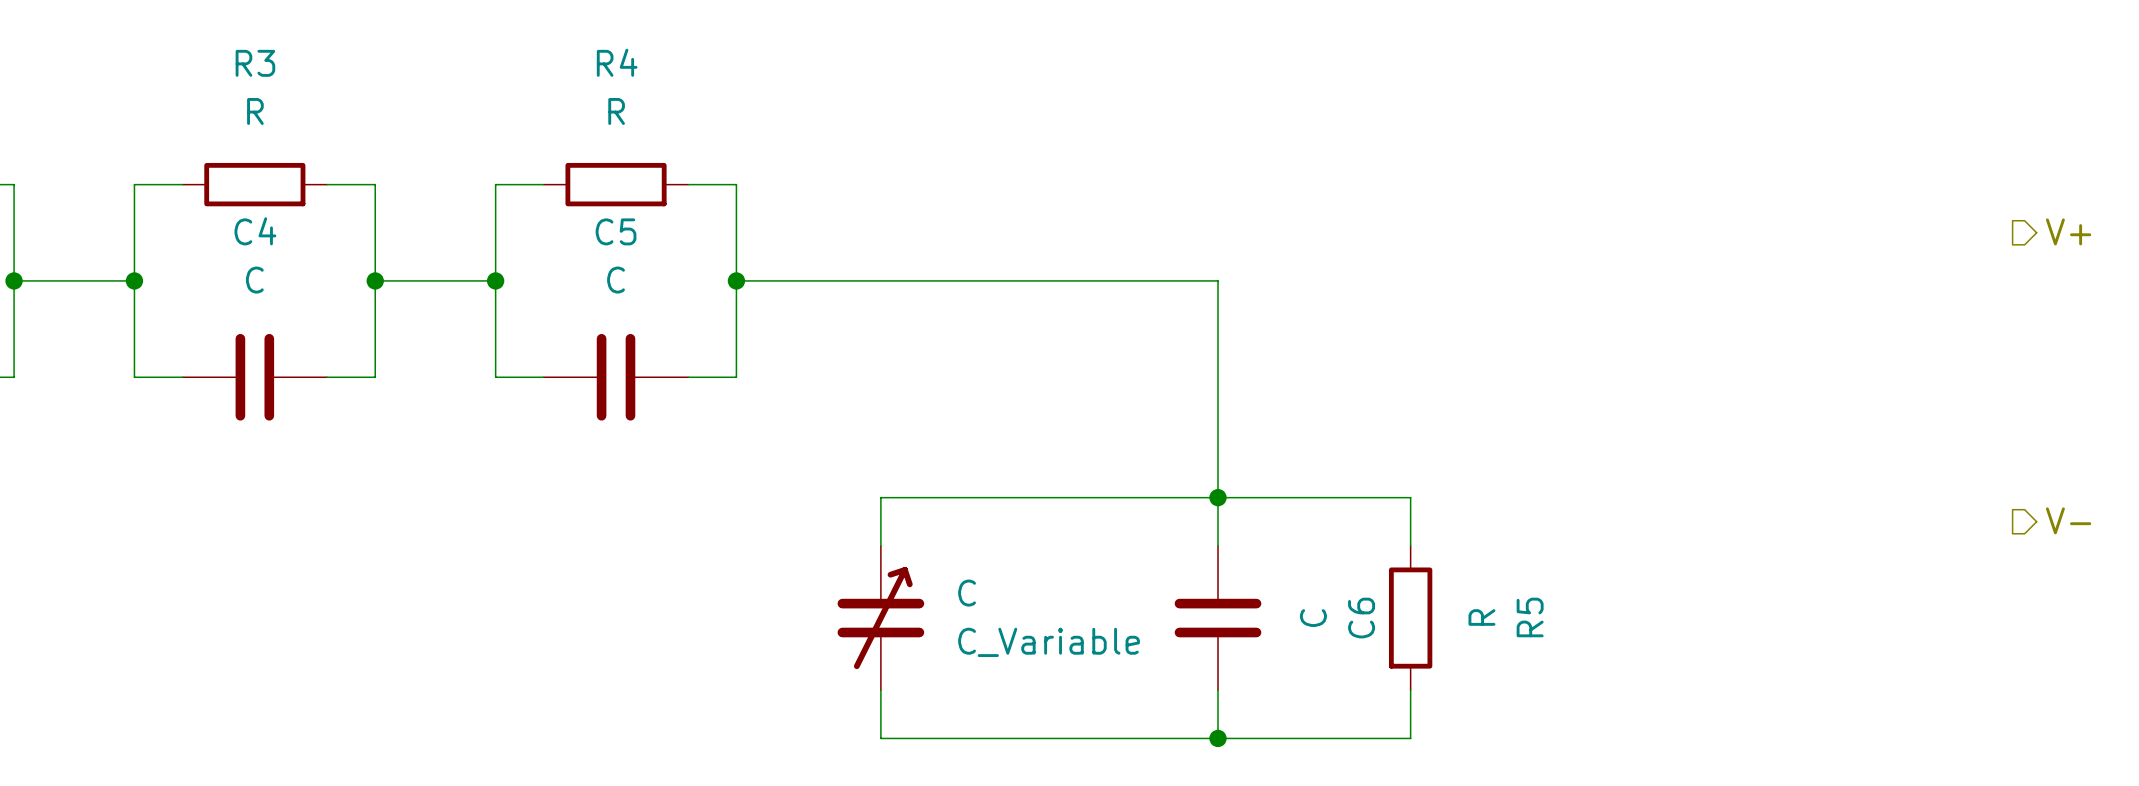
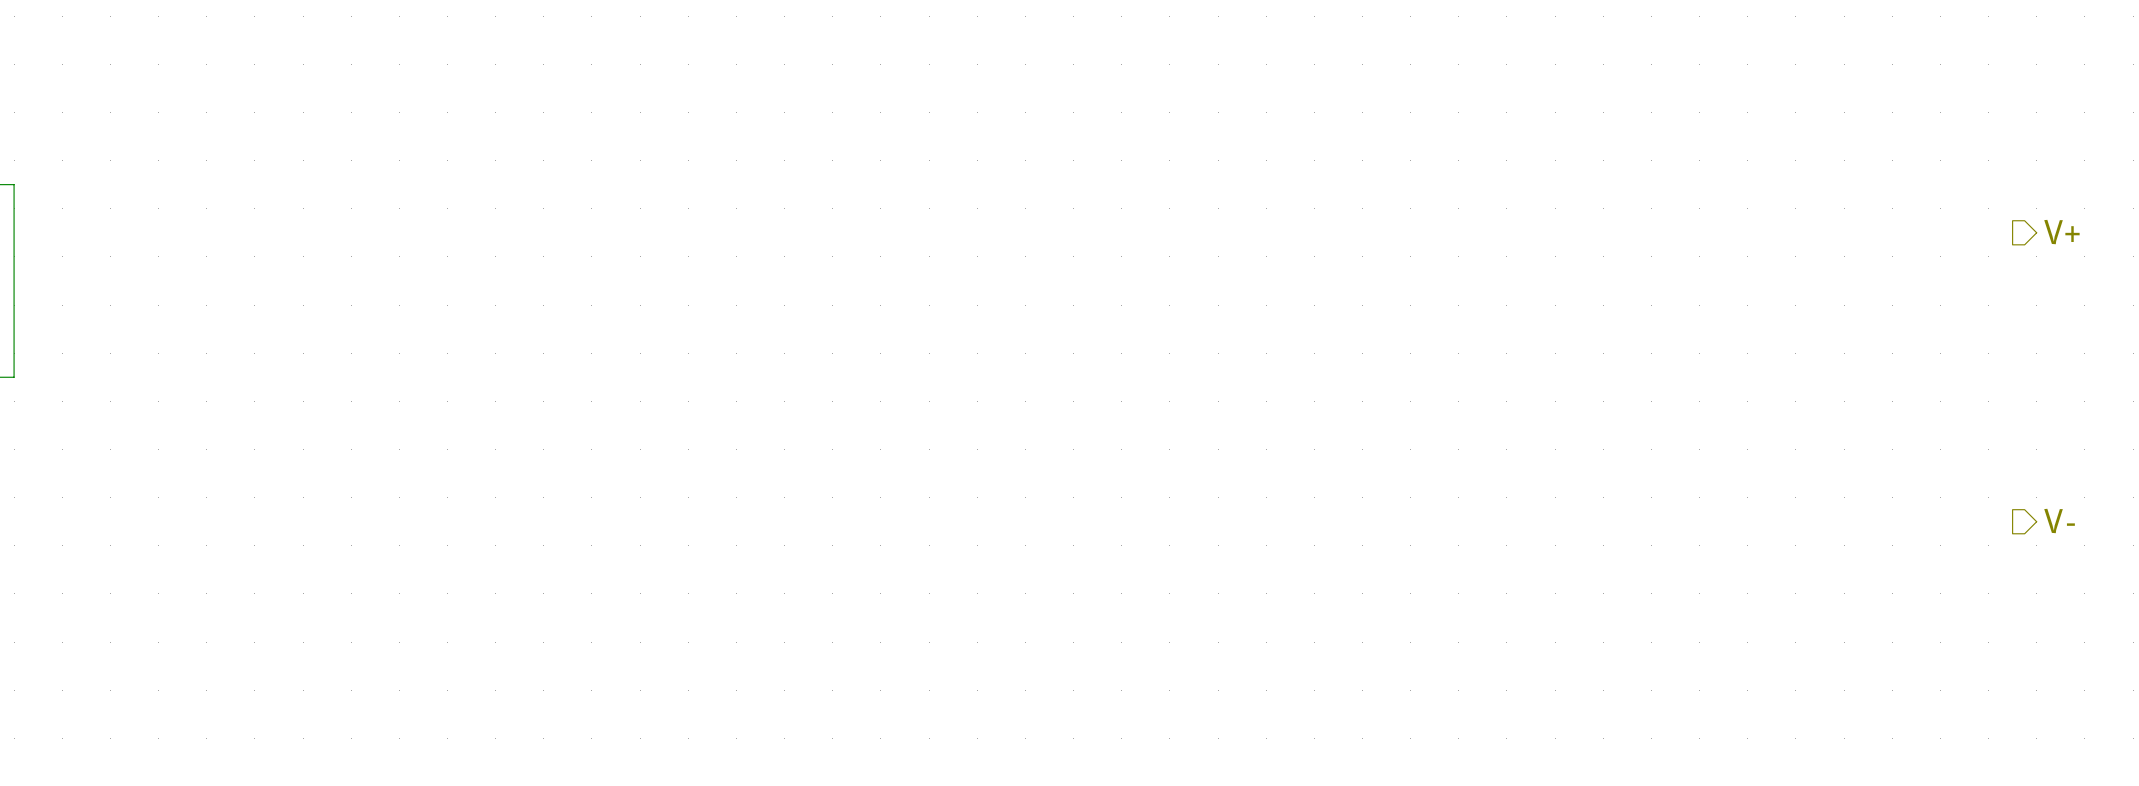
wire: (182, 184) (134, 184) (134, 377) (182, 377) -> none
R3: R (254, 184) -> none
wire: (327, 184) (375, 184) (375, 377) (327, 377) -> none
wire: (543, 184) (495, 184) (495, 377) (543, 377) -> none
R4: R (616, 184) -> none
wire: (688, 184) (736, 184) (736, 377) (688, 377) -> none
wire: (14, 280) (134, 280) -> none
junction: (14, 280) -> none
junction: (134, 280) -> none
wire: (375, 280) (495, 280) -> none
junction: (375, 280) -> none
junction: (495, 280) -> none
wire: (736, 280) (1218, 280) (1218, 545) -> none
junction: (736, 280) -> none
C4: C (254, 377) -> none
C5: C (616, 377) -> none
junction: (1218, 497) -> none
wire: (880, 545) (880, 497) (1410, 497) (1410, 545) -> none
C: C_Variable (880, 618) -> none
C6: C (1218, 618) -> none
R5: R (1410, 618) -> none
wire: (880, 690) (880, 738) (1410, 738) (1410, 690) -> none
wire: (1218, 690) (1218, 738) -> none
junction: (1218, 738) -> none

